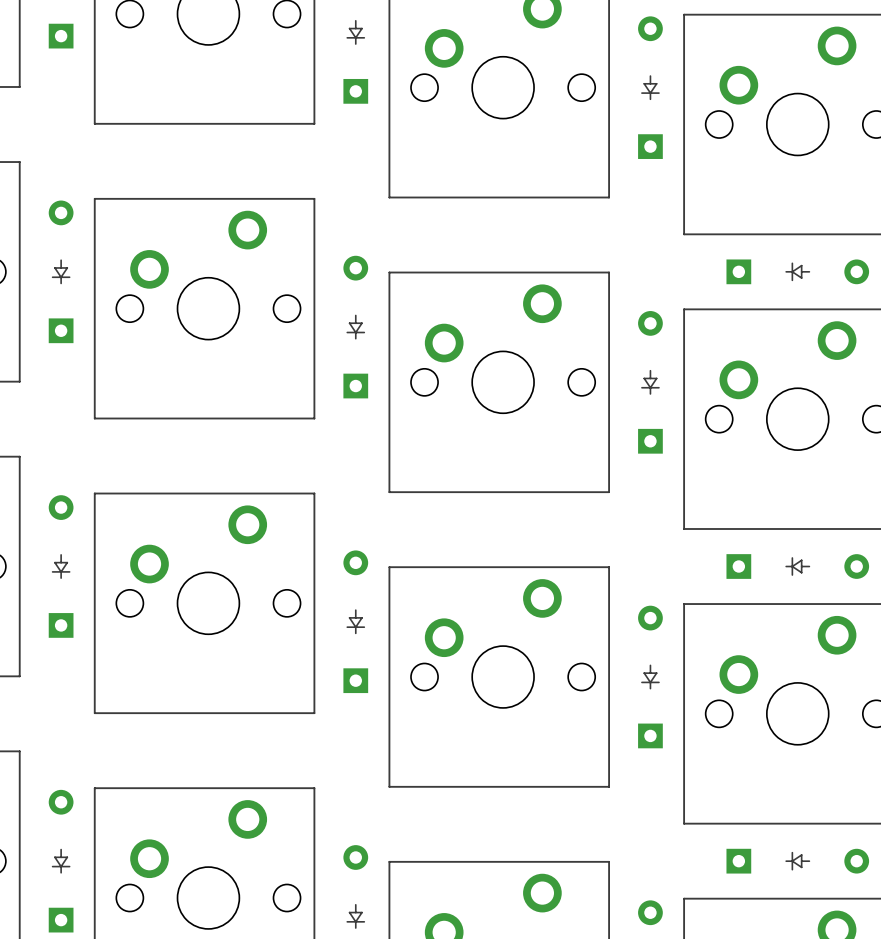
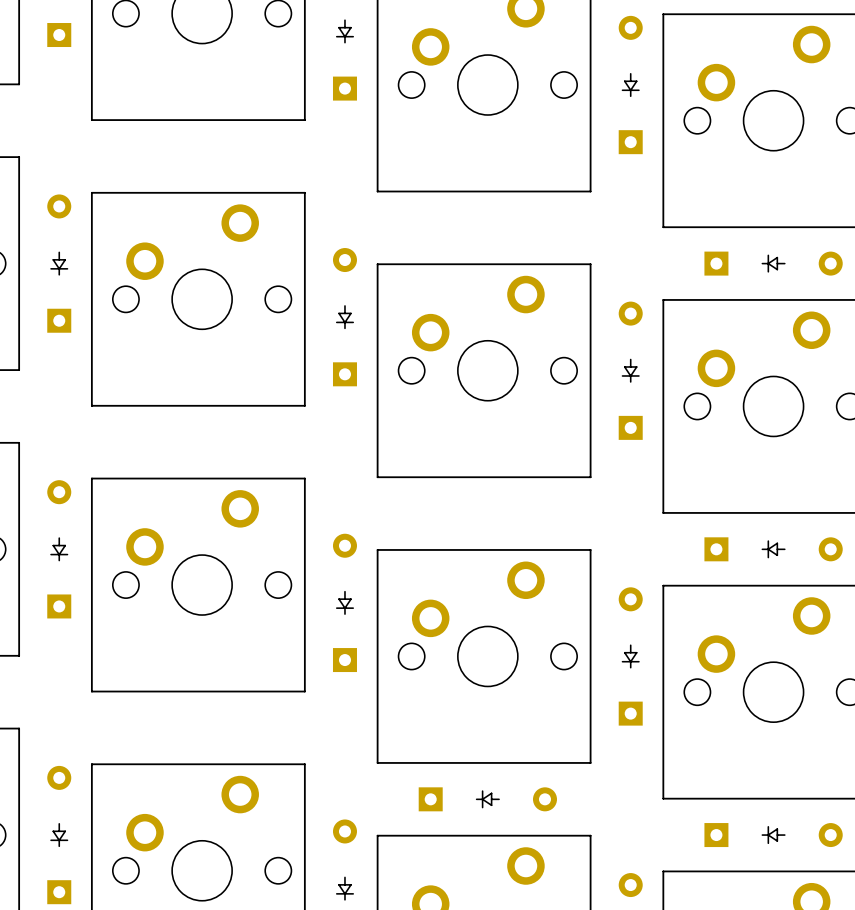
part: none -> (487, 799)

